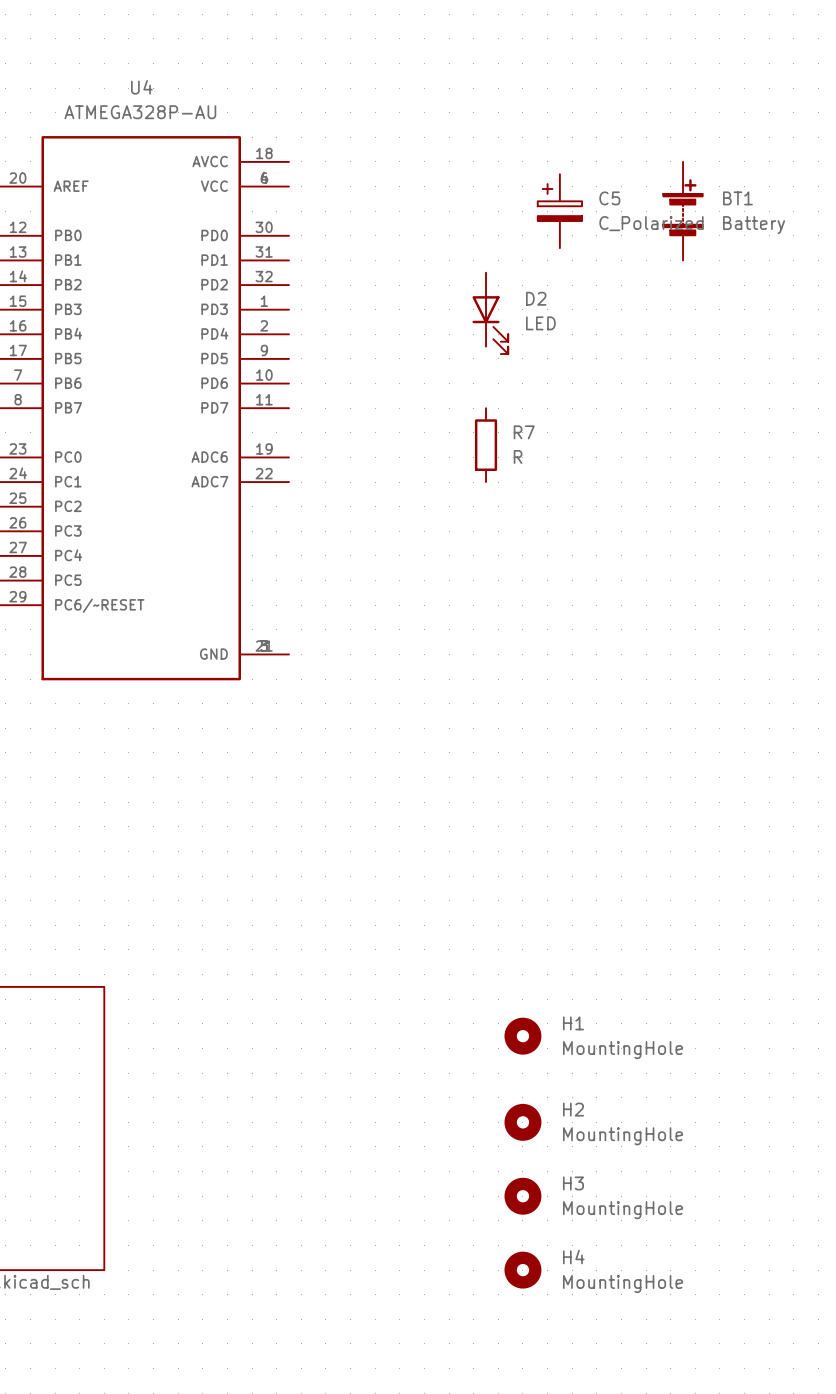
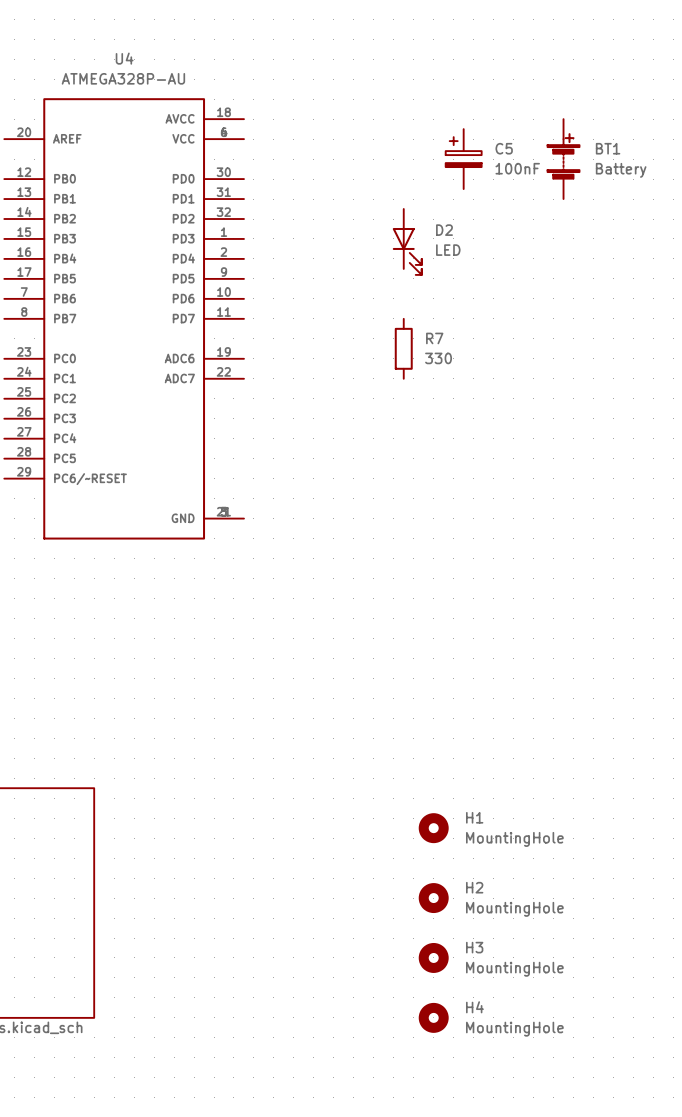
C5 value: C_Polarized (651, 223) -> 100nF (517, 168)
R7 value: R (518, 456) -> 330 (438, 358)

